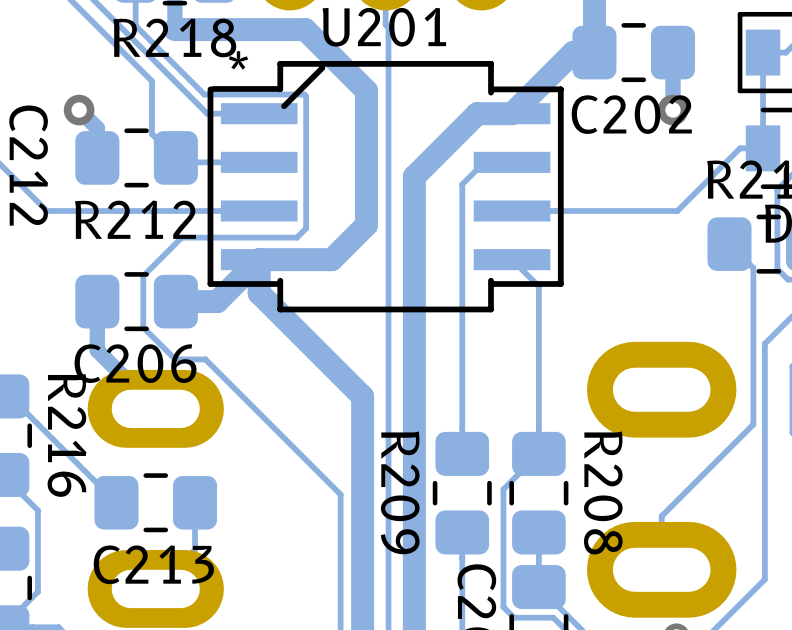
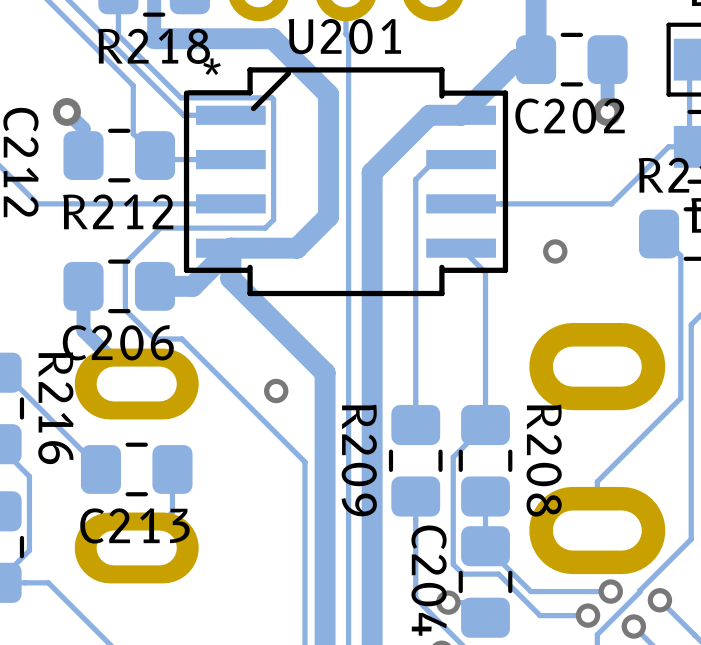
via: none -> (555, 251)
via: none -> (276, 391)

